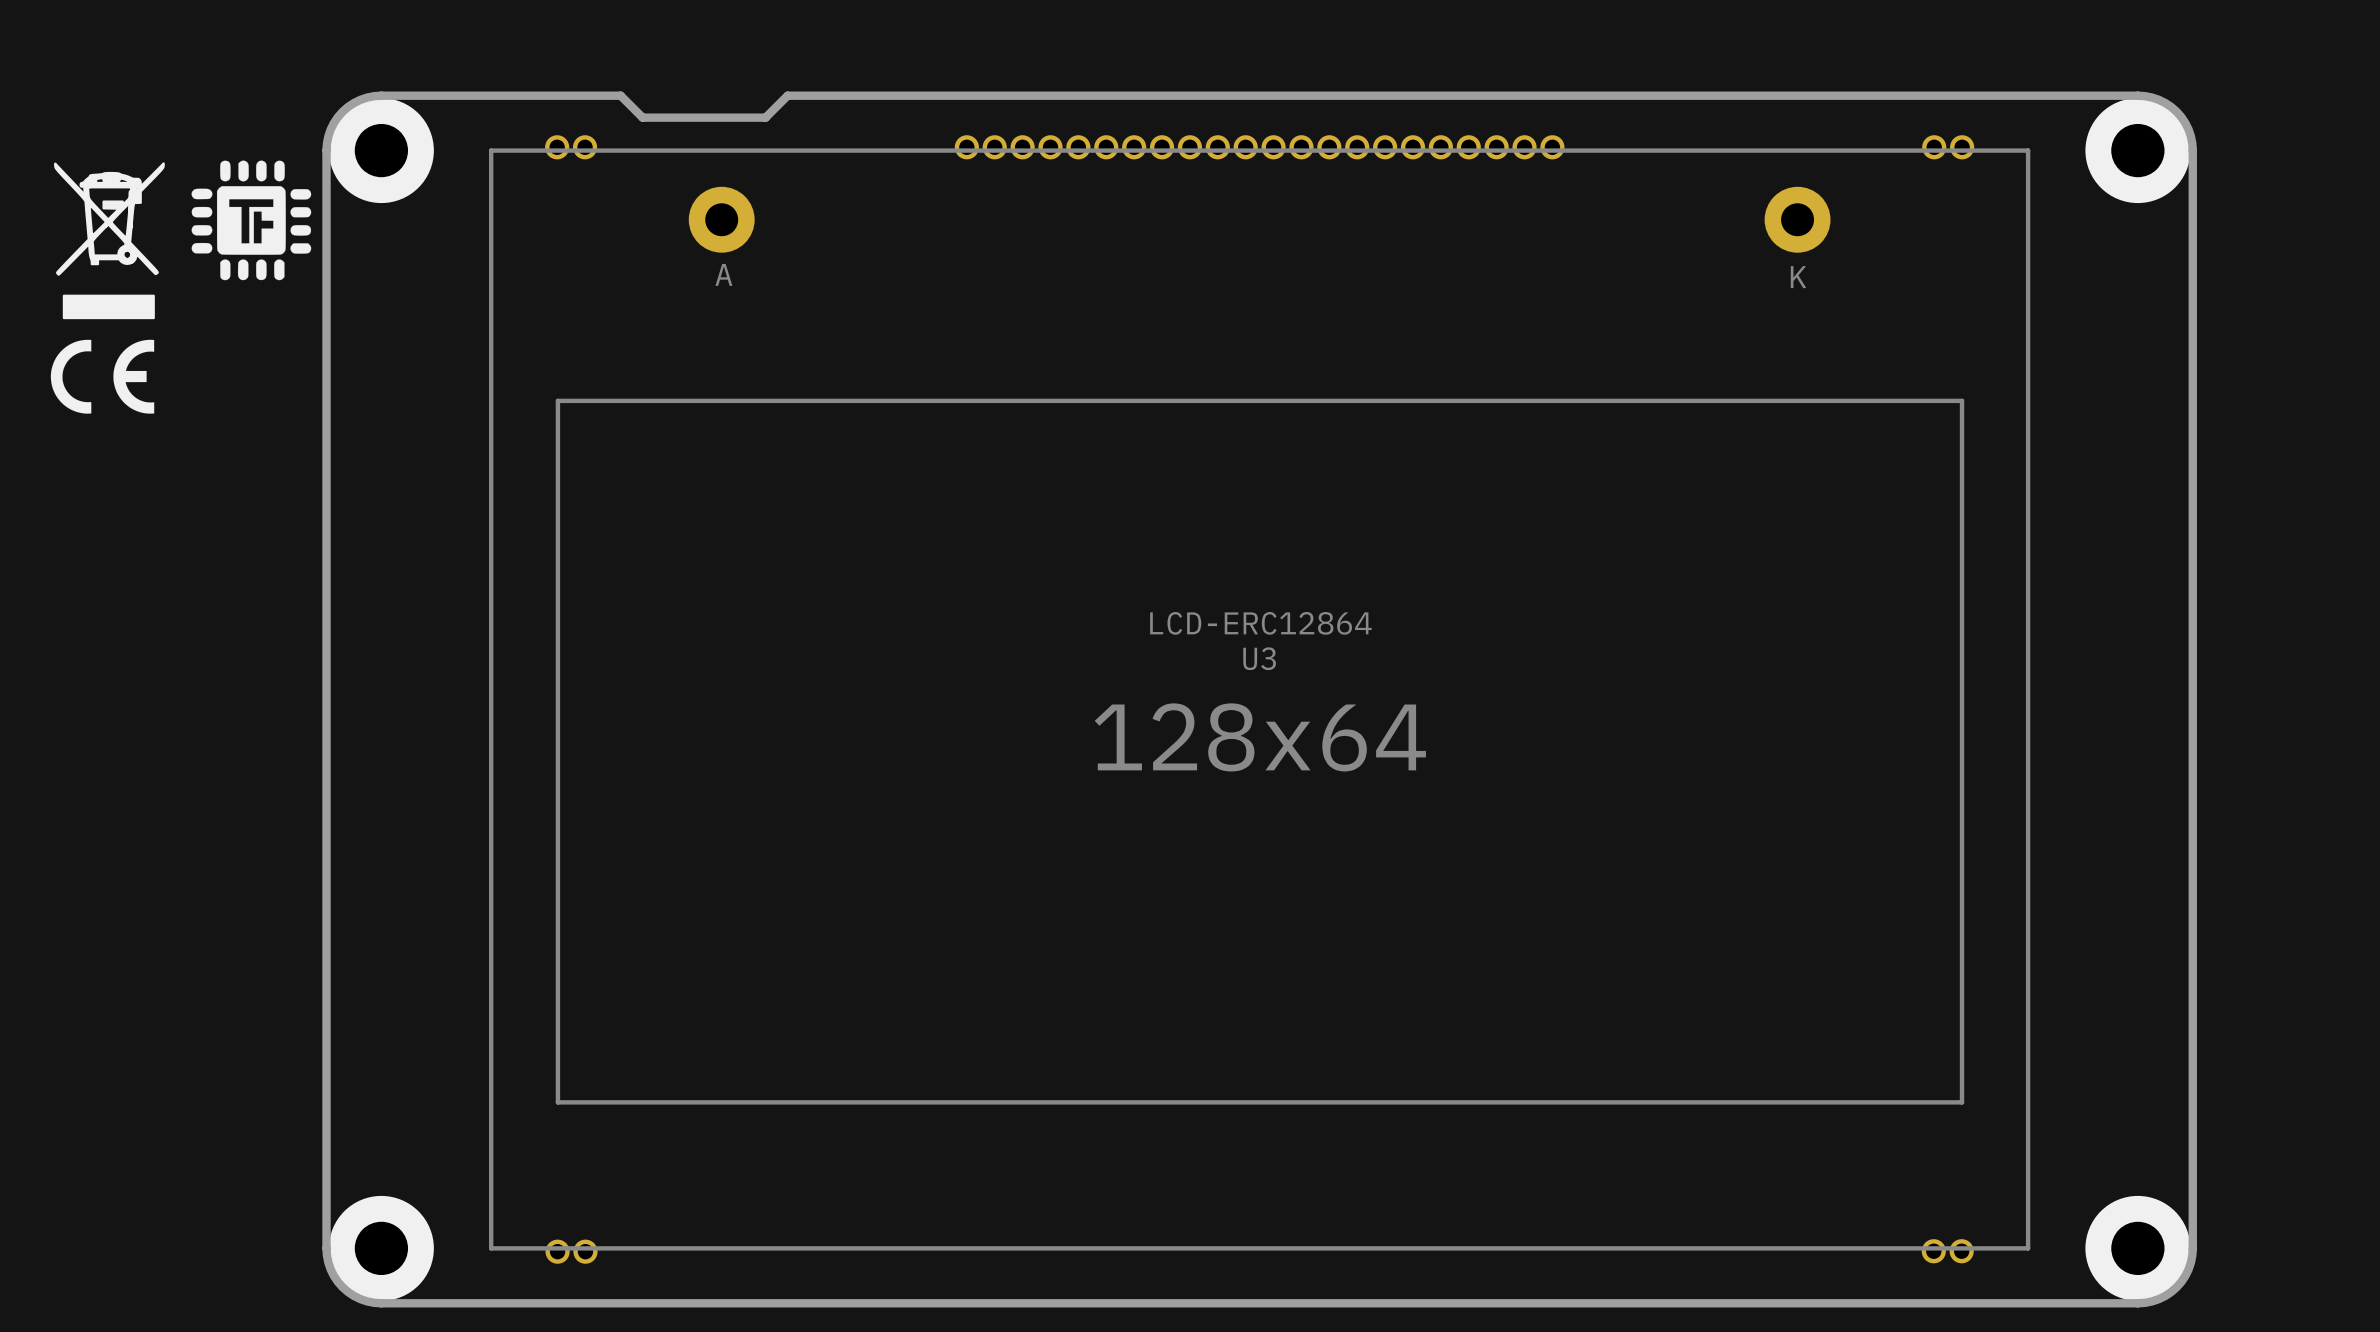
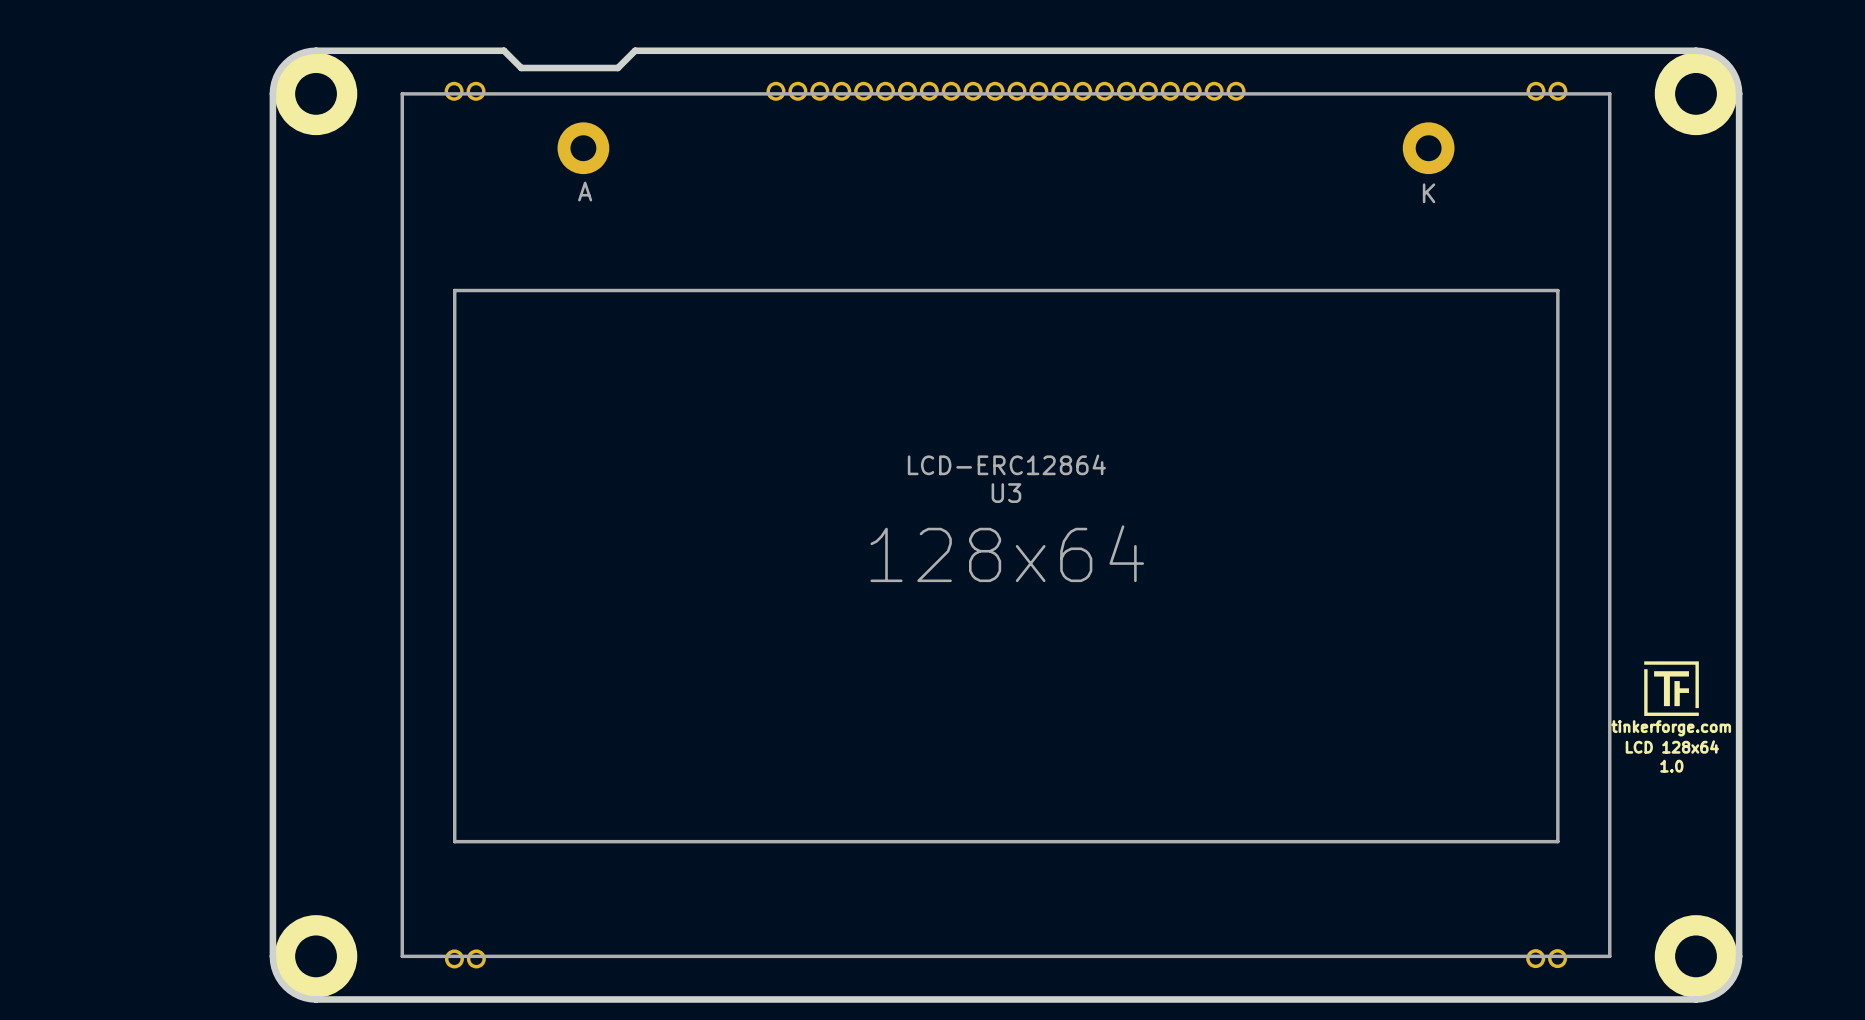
drawing: [191, 160, 312, 281] -> none
drawing: [50, 162, 165, 414] -> none
drawing: none -> [1644, 661, 1699, 716]
text: none -> tinkerforge.com (1671, 728)
text: none -> LCD 128x64 (1672, 747)
text: none -> 1.0 (1671, 766)

